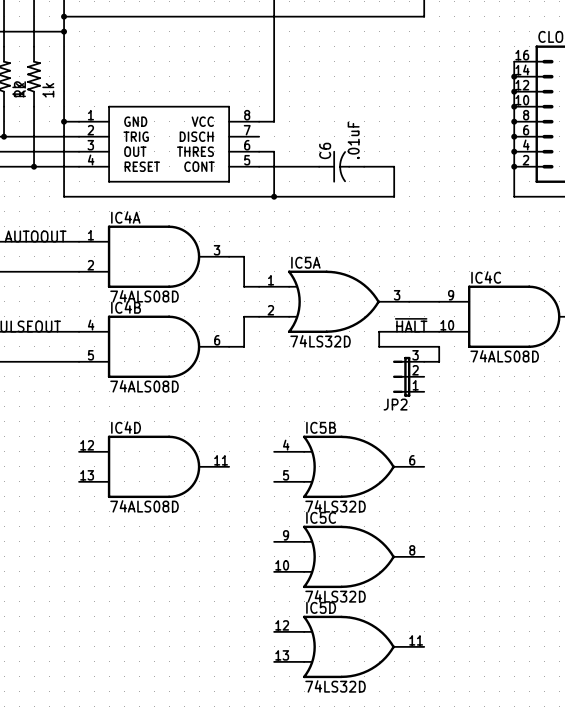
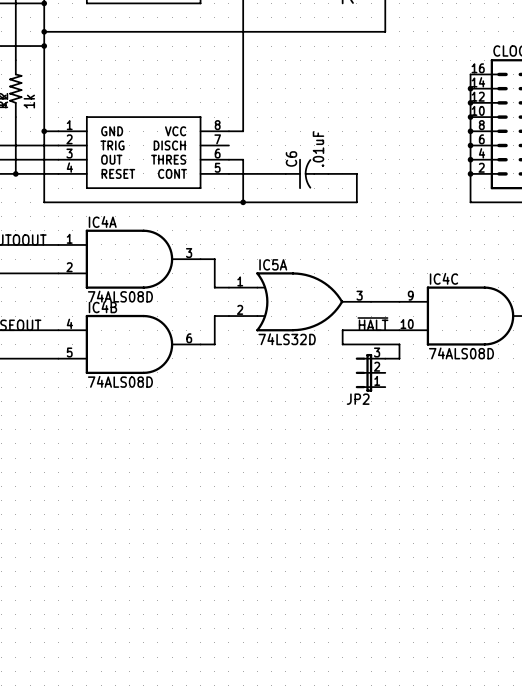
IC4D: 74ALS08D (154, 466) -> none
IC5B: 74LS32D (349, 466) -> none
IC5C: 74LS32D (349, 556) -> none
IC5D: 74LS32D (349, 646) -> none

